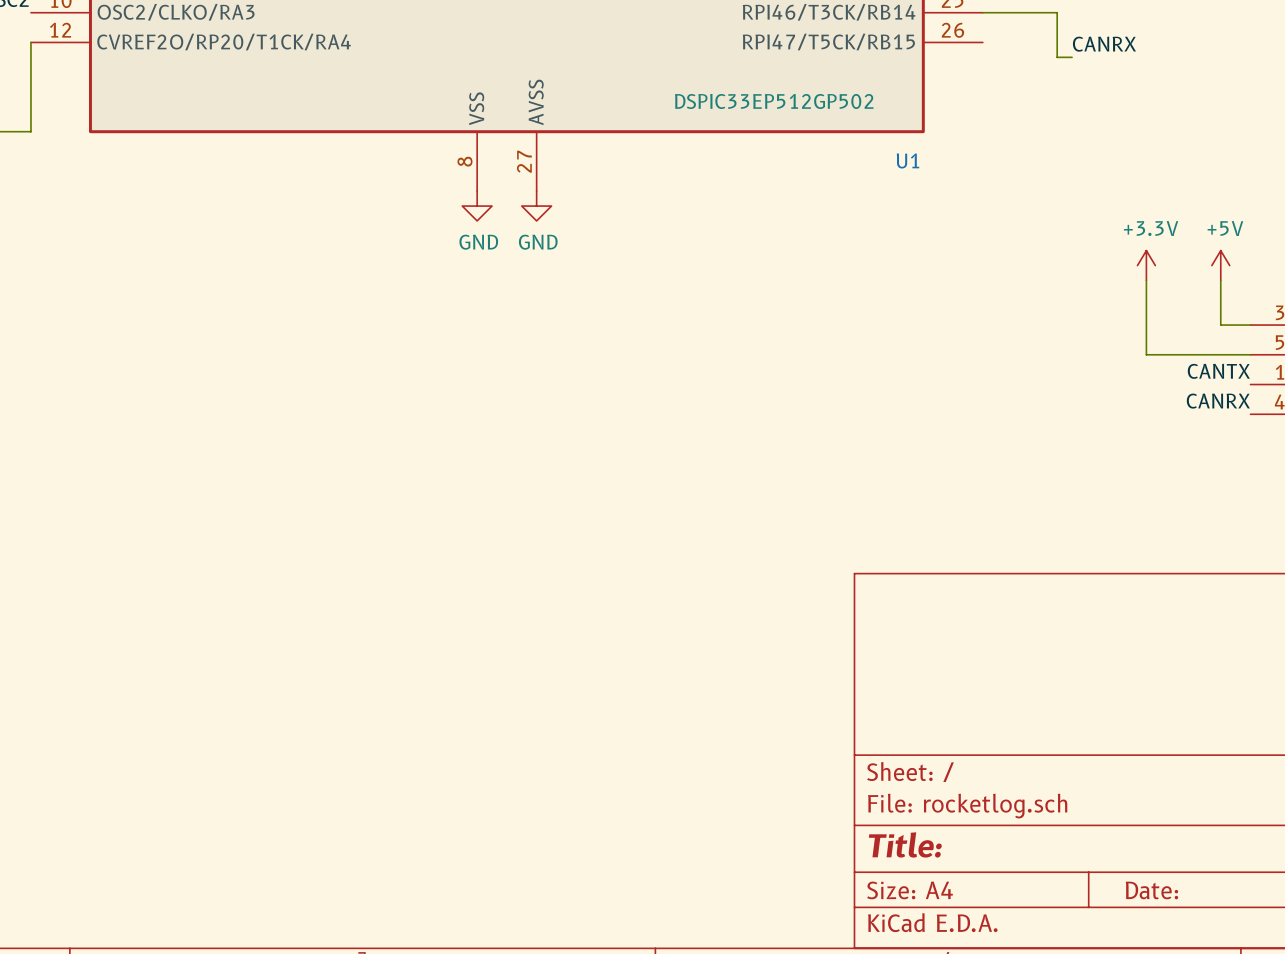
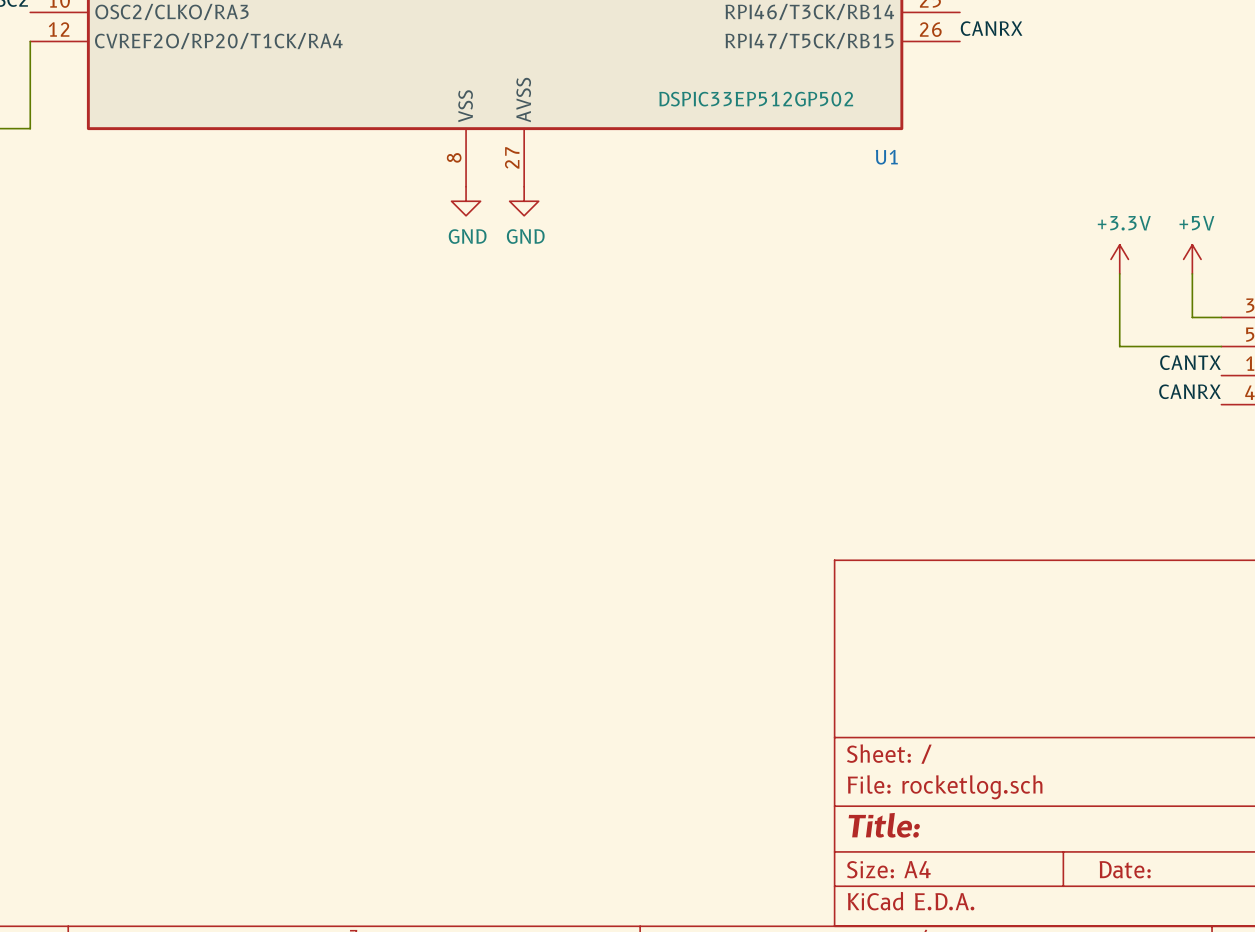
wire: (982, 12) (1057, 12) (1057, 57) (1072, 57) -> none
label position: CANRX (1104, 44) -> CANRX (991, 28)

